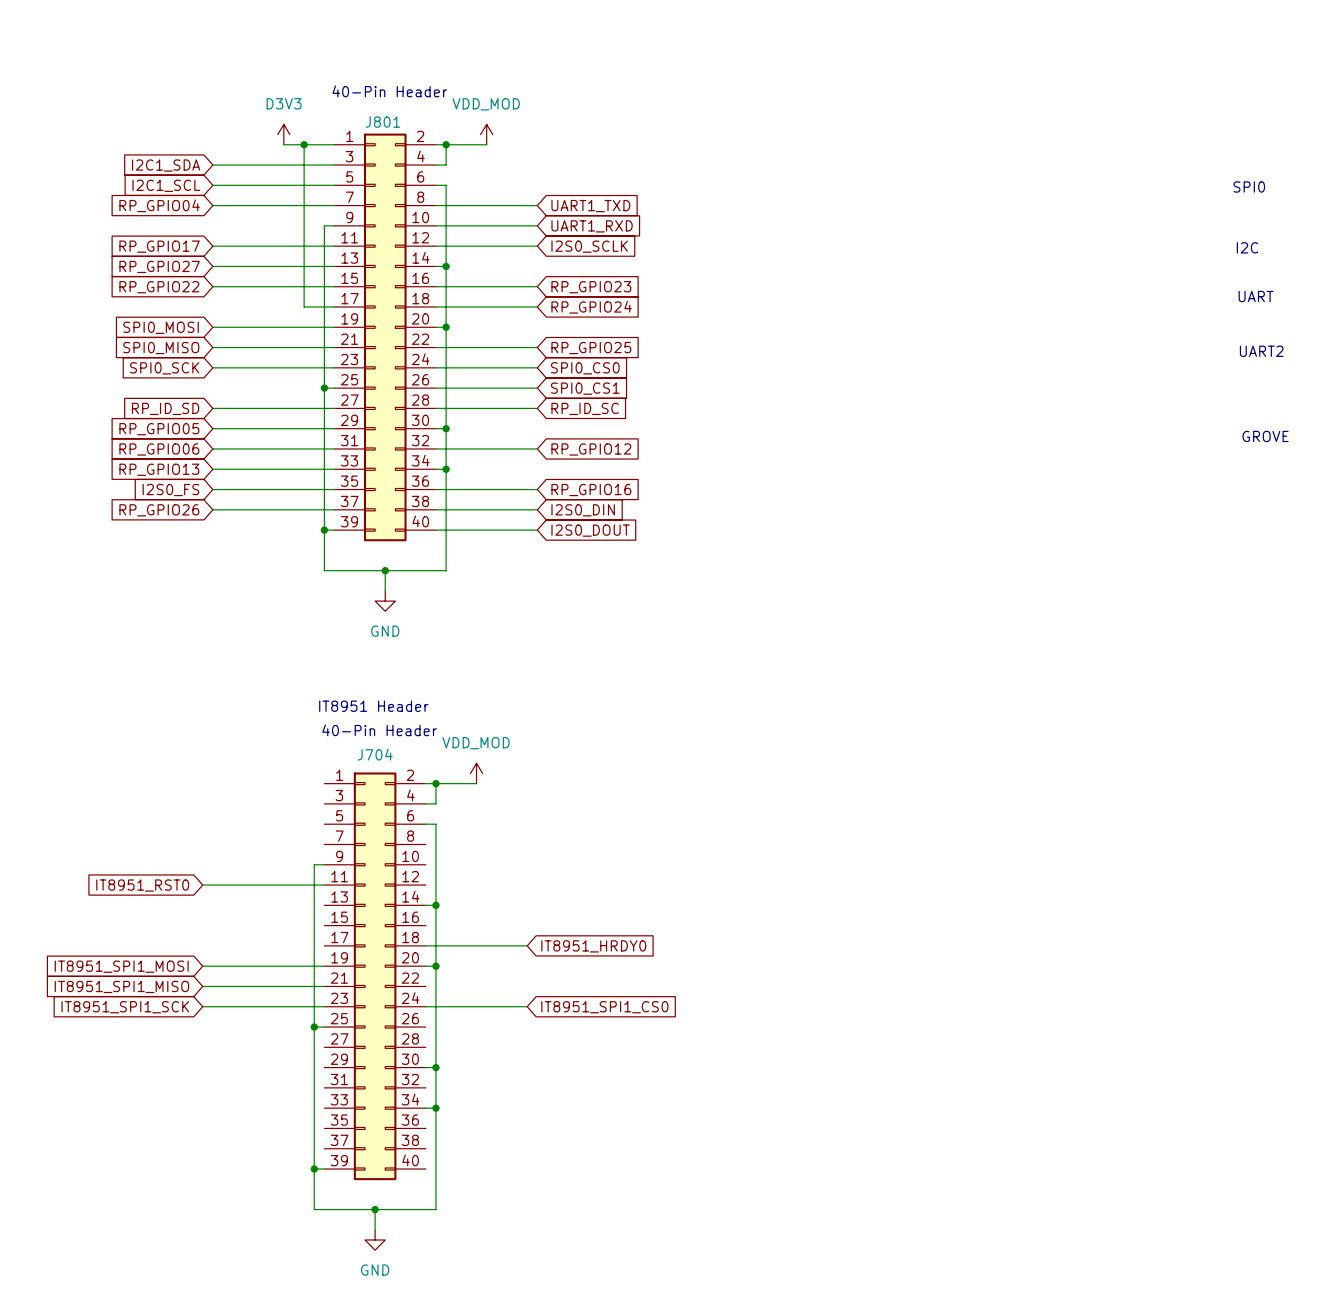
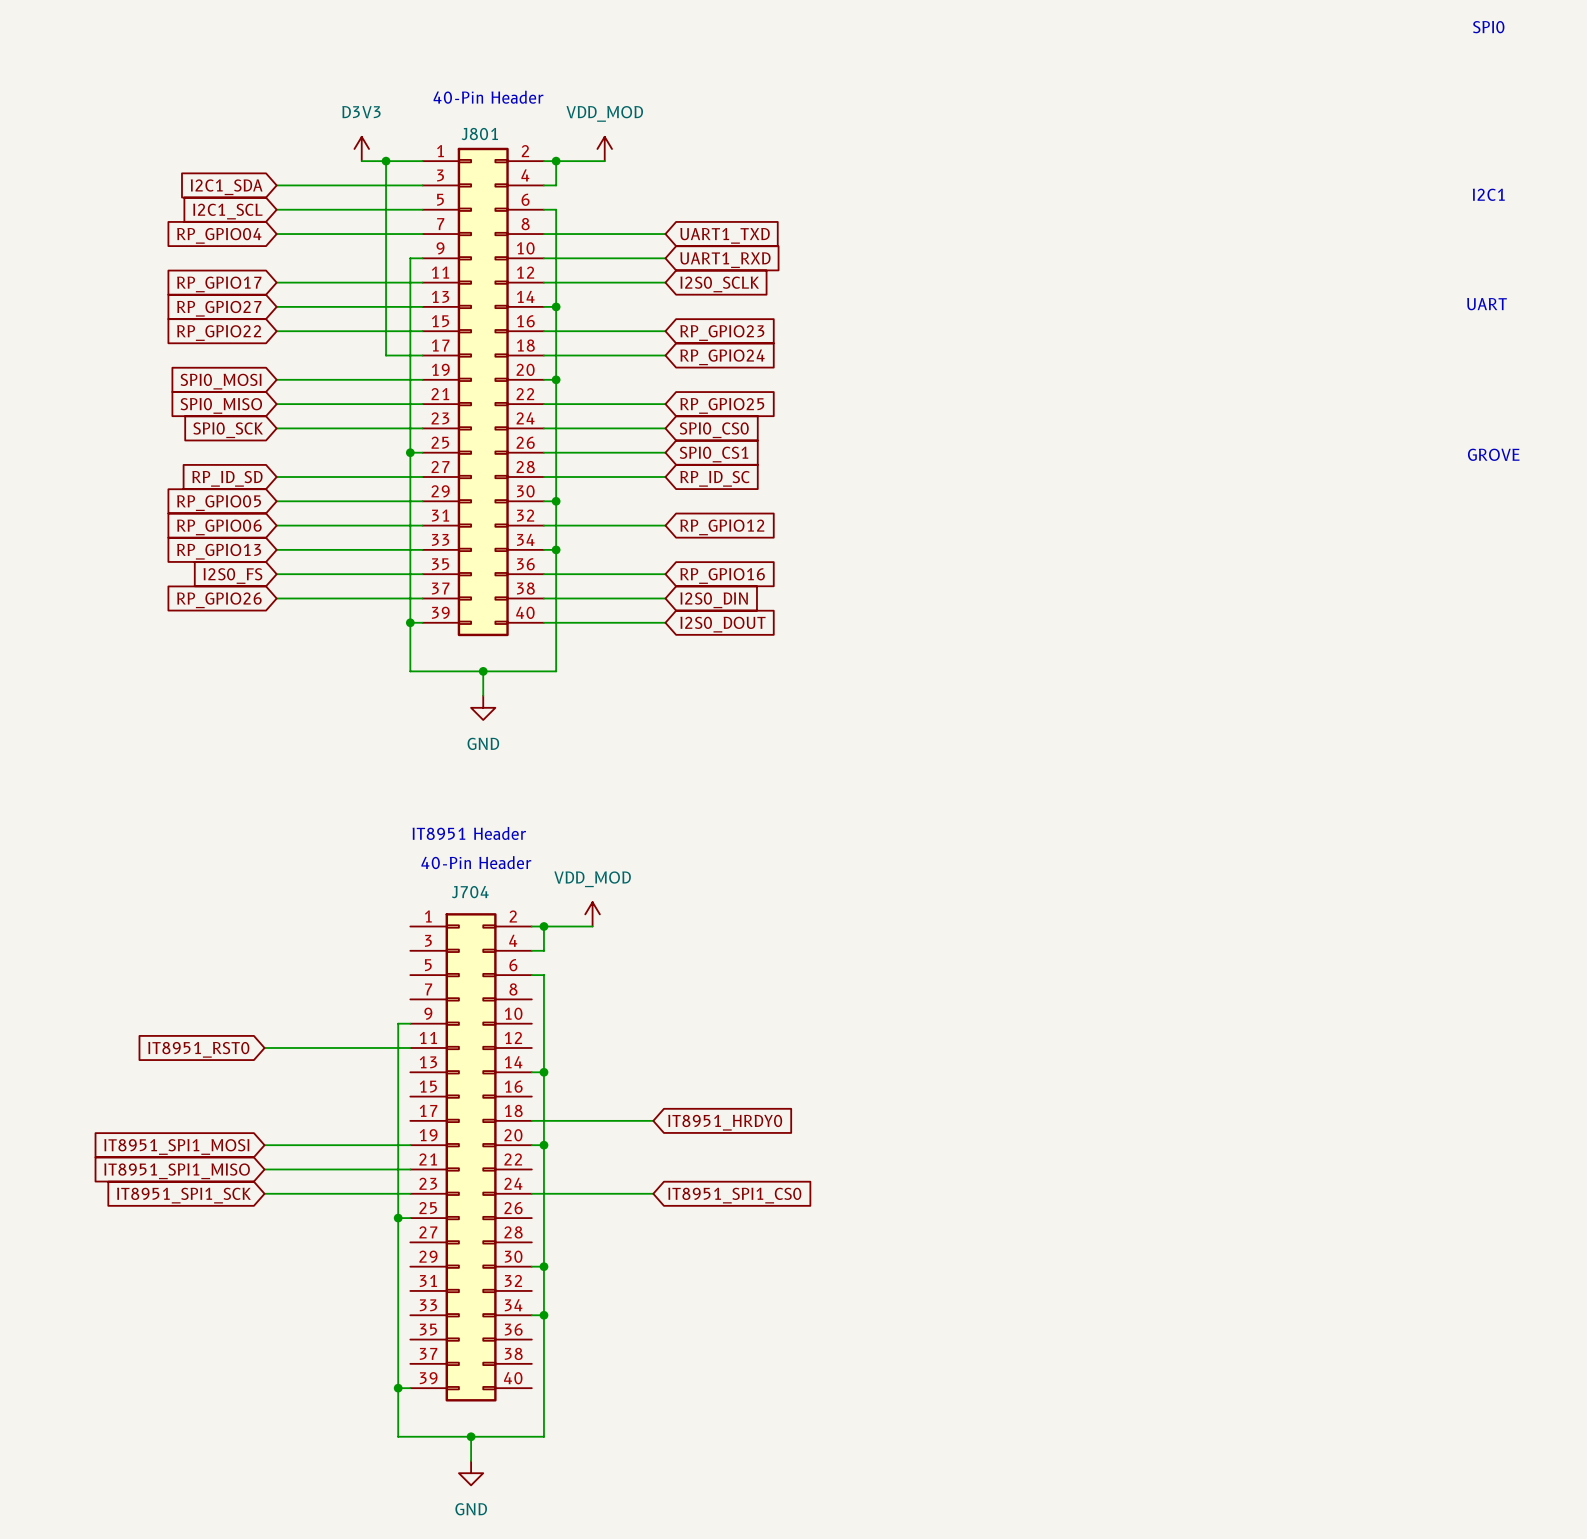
text: none -> I2C1 (1488, 194)
text position: SPI0 (1249, 186) -> SPI0 (1488, 27)
text: I2C (1247, 247) -> none
text position: UART (1256, 296) -> UART (1486, 304)
text: UART2 (1261, 351) -> none
text position: GROVE (1265, 436) -> GROVE (1493, 454)

